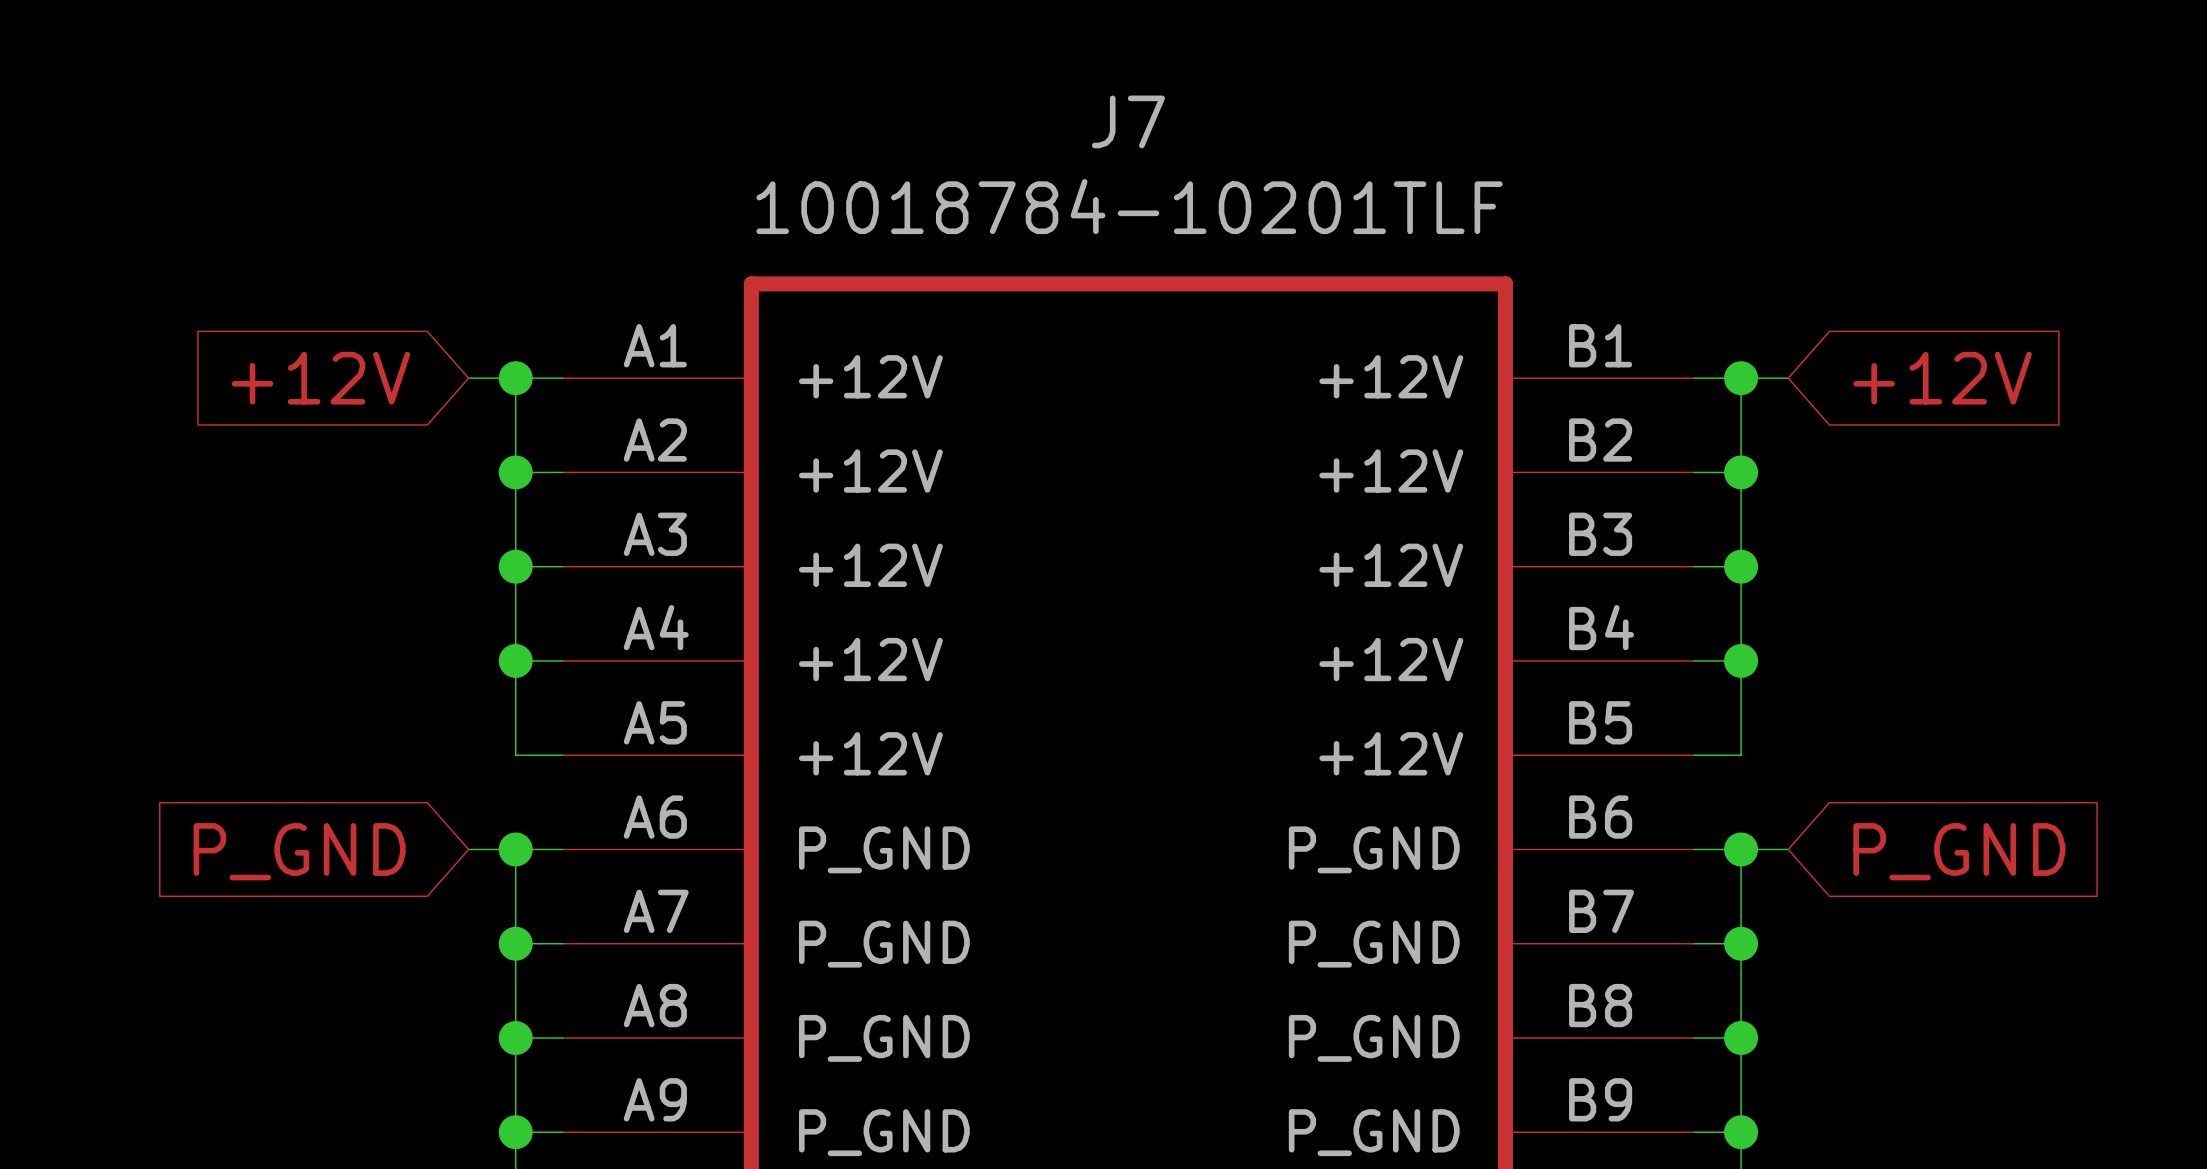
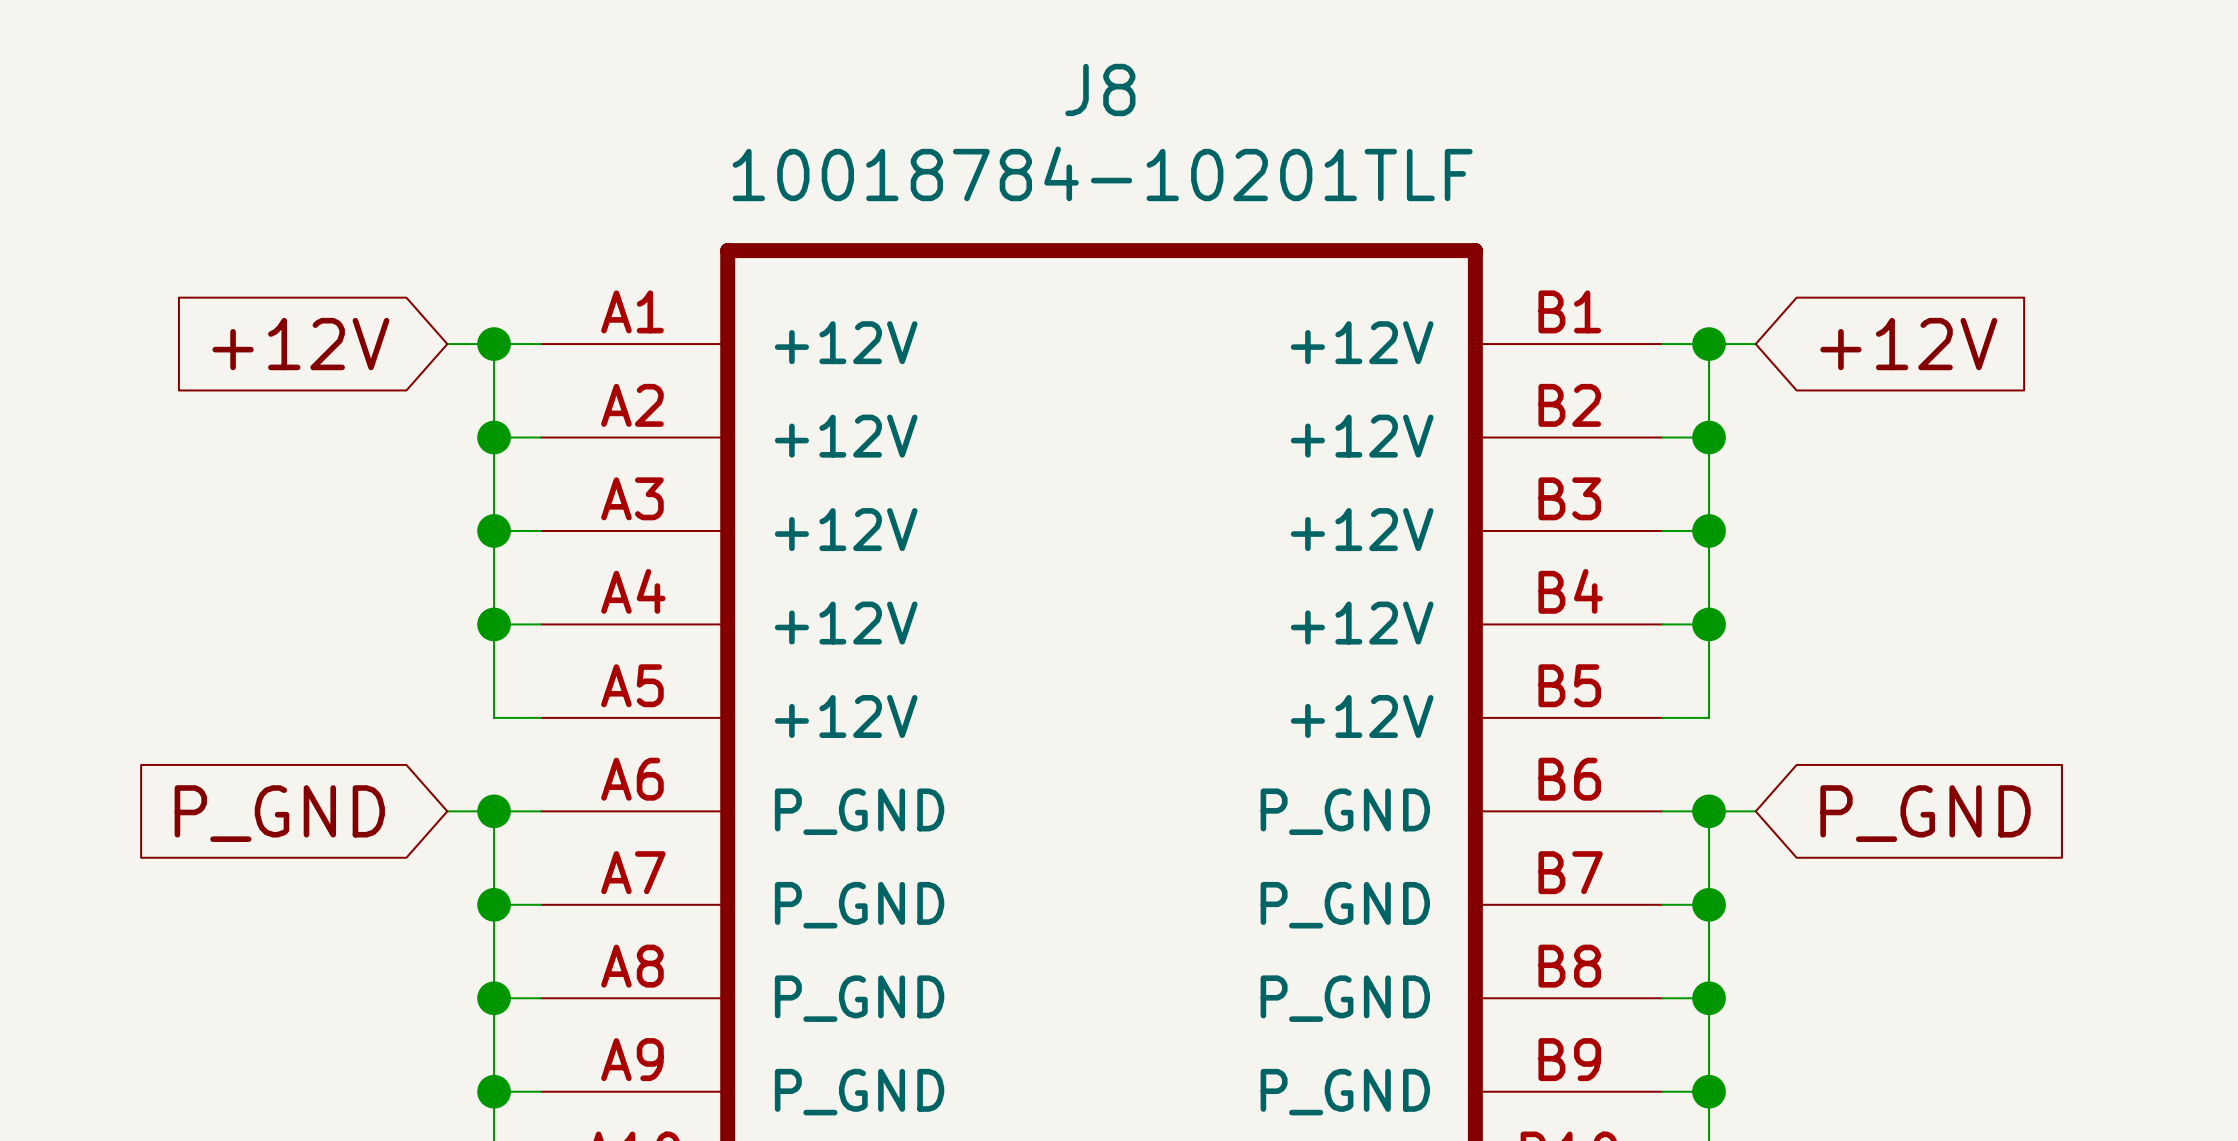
J7 name: J7 (1128, 121) -> J8 (1100, 89)

